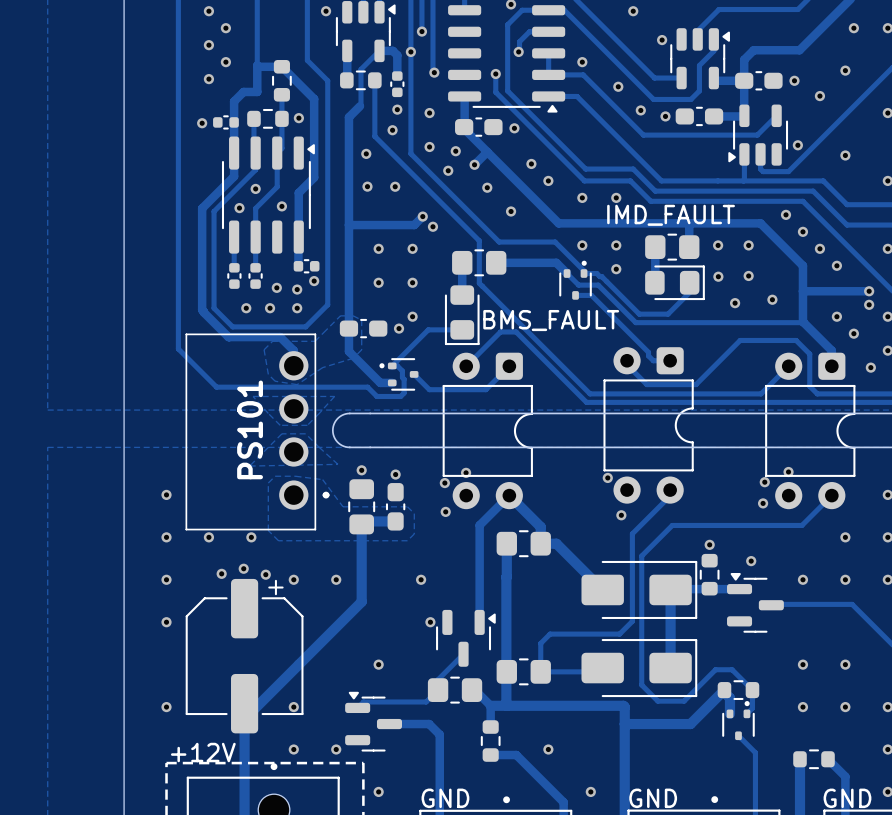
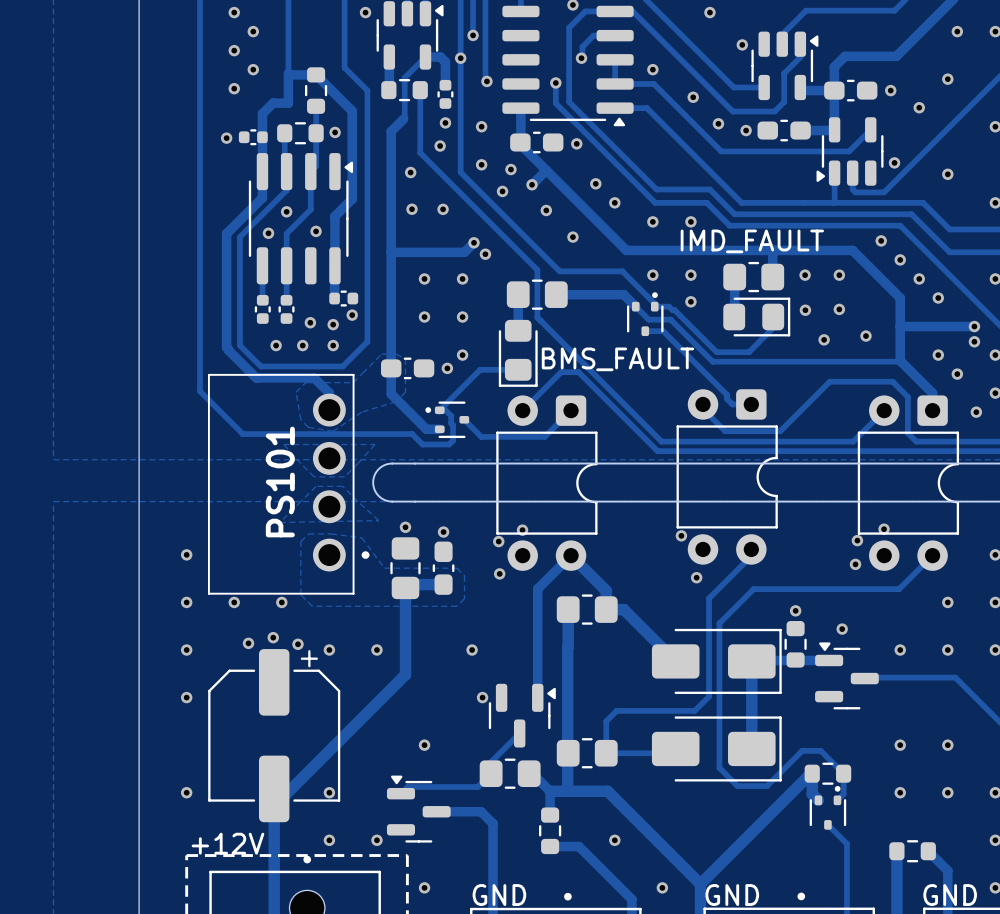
track: (724, 690) (690, 724) (624, 724) -> none
track: (724, 692) (729, 698) (729, 713) -> none
track: (542, 705) (623, 705) (624, 788) -> (607, 791) (700, 884) (808, 776) (812, 776) (812, 794) (818, 800)

